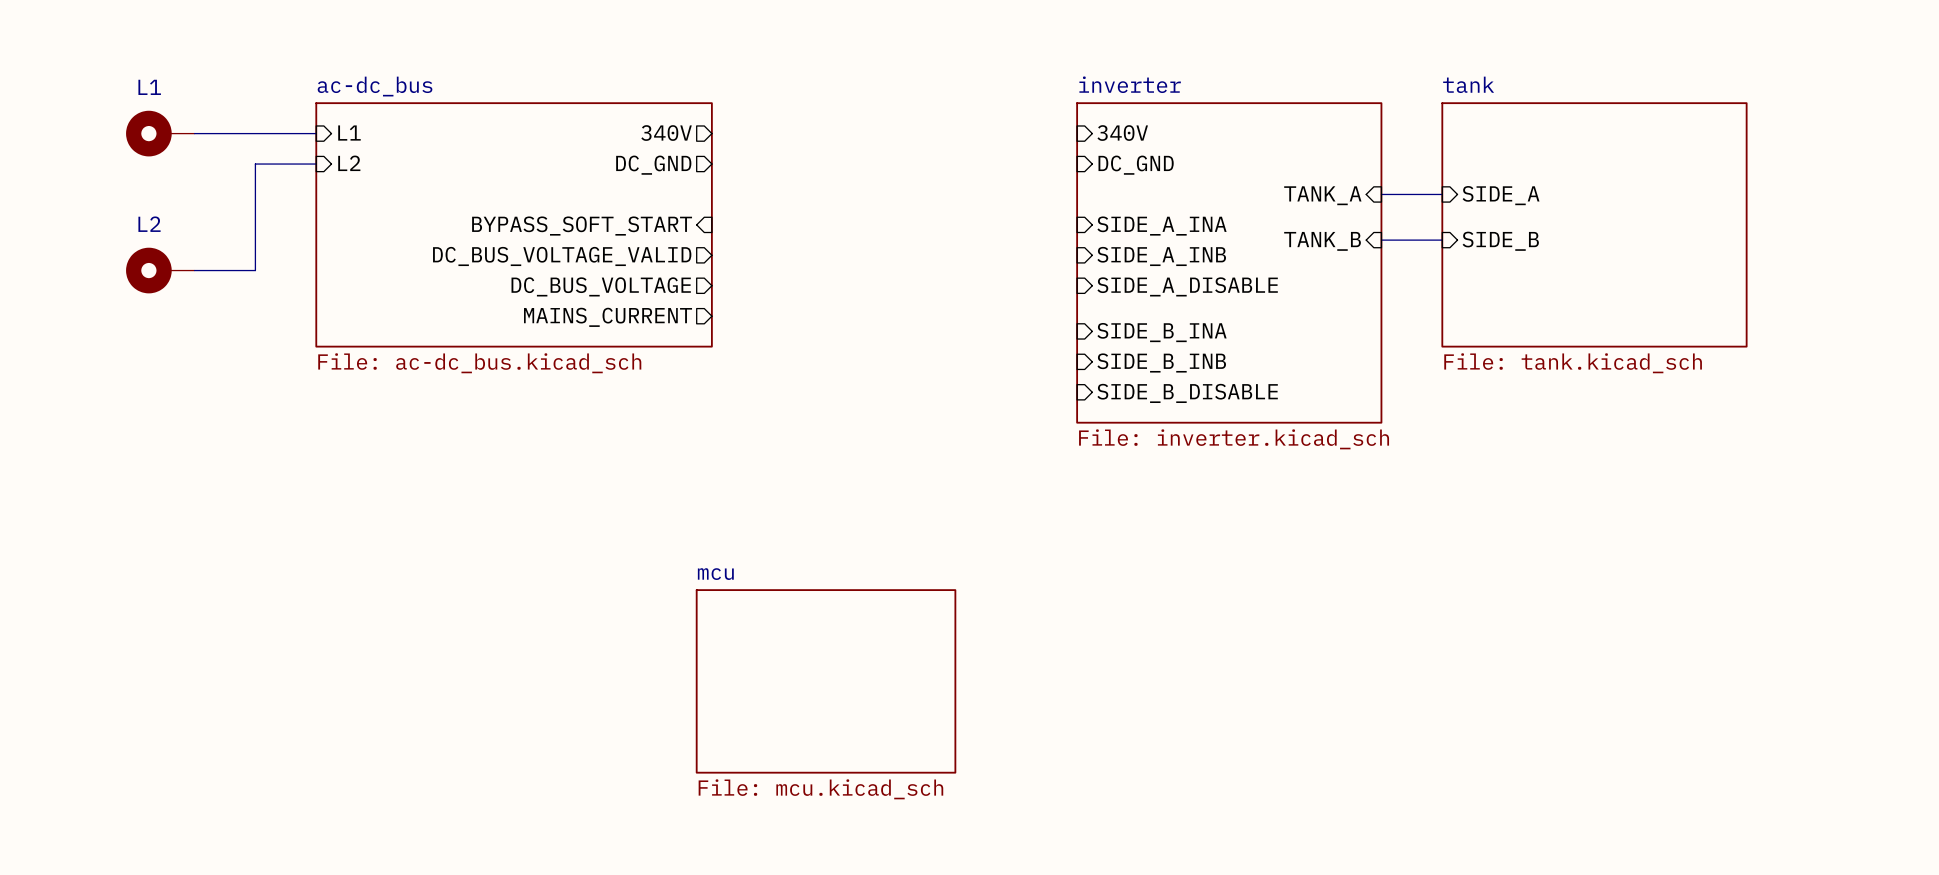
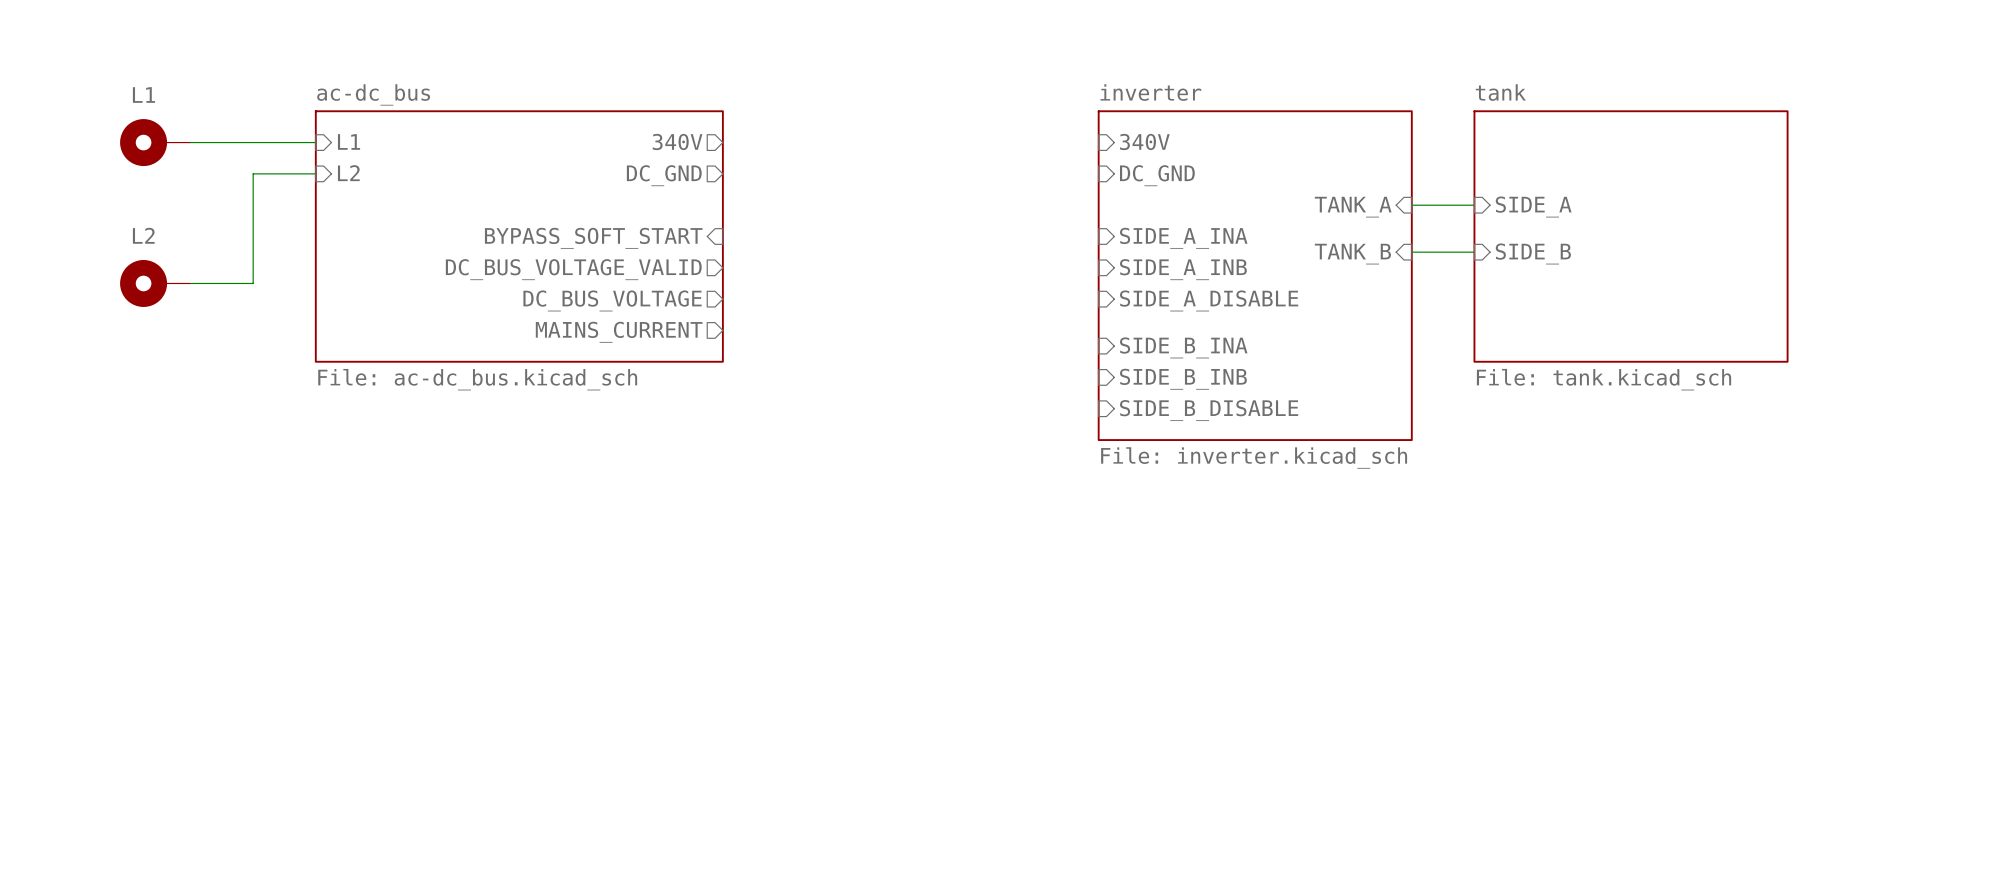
sheet mcu: File: mcu.kicad_sch (826, 681) -> none

